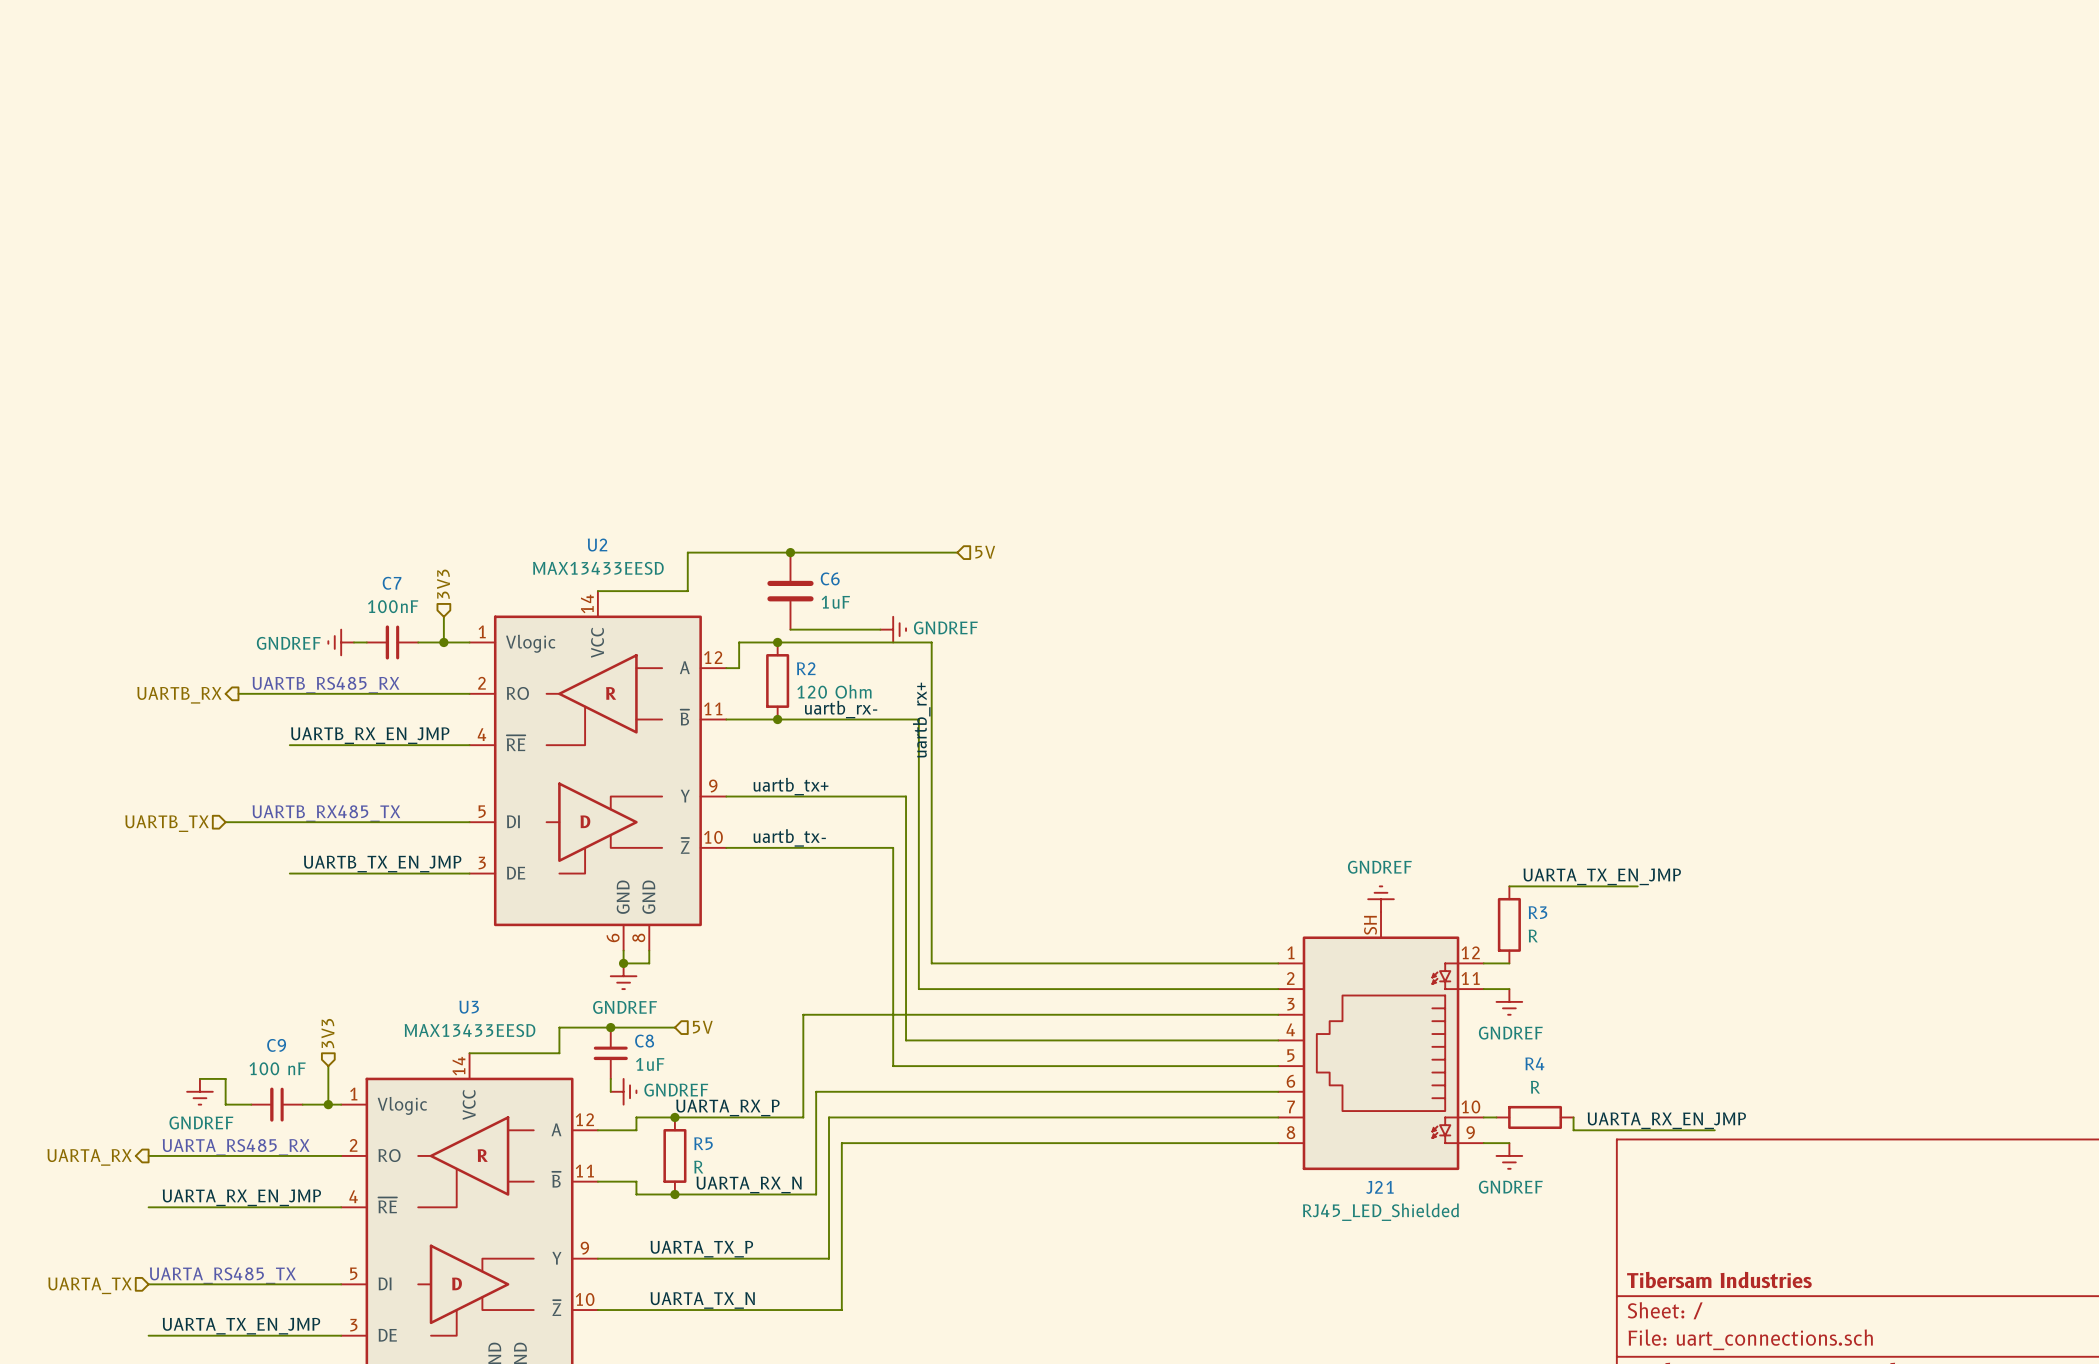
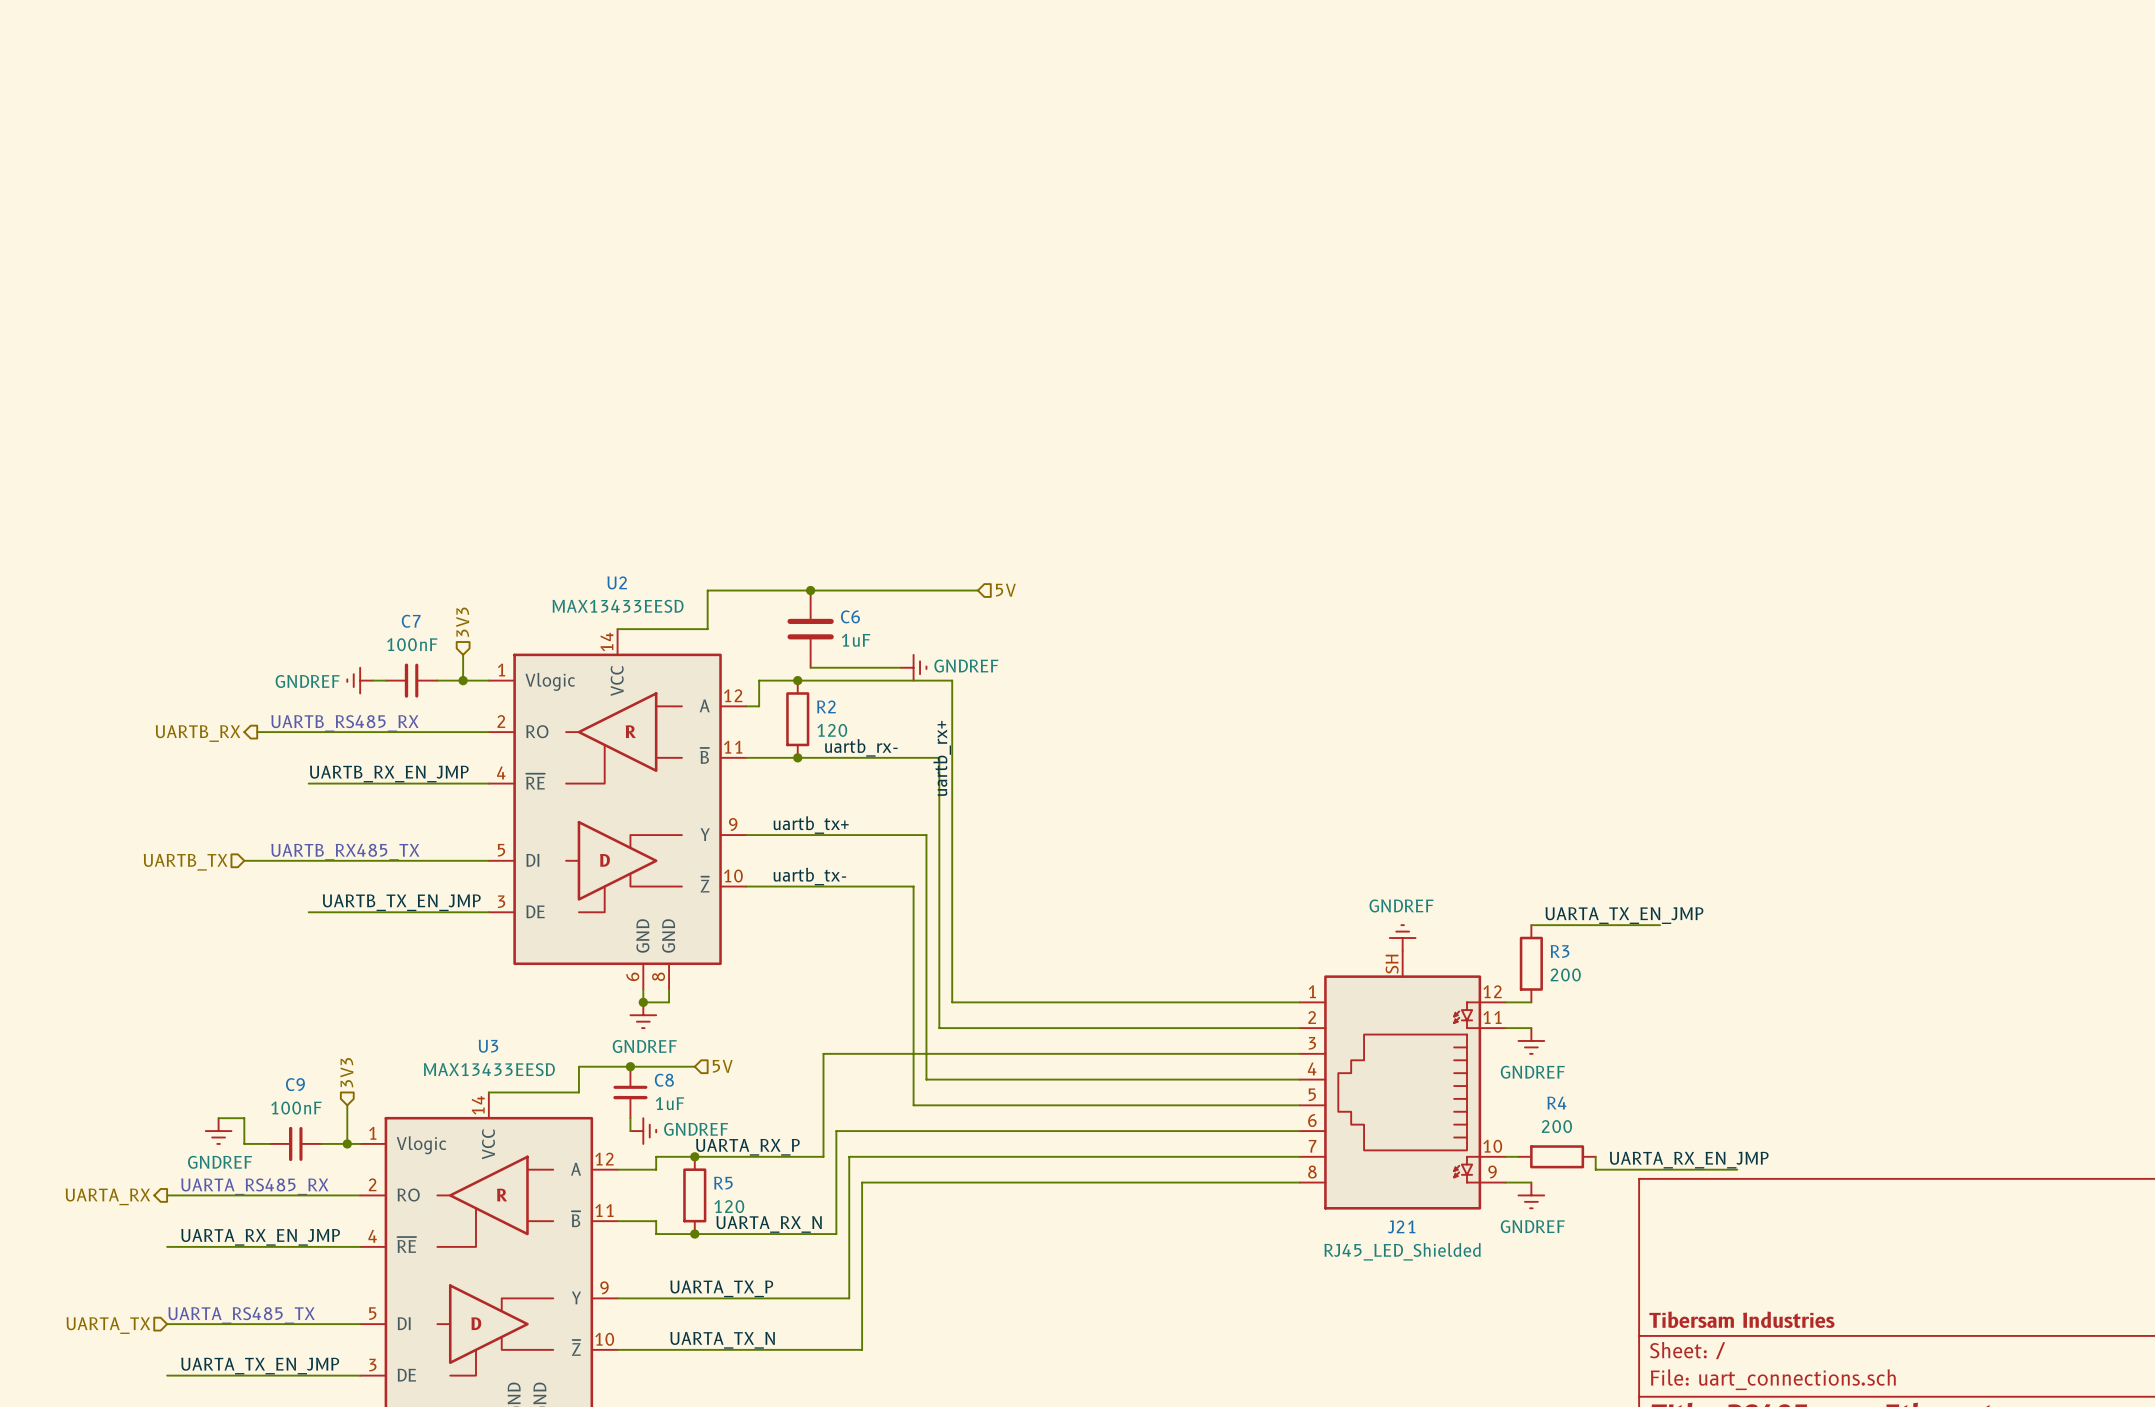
R2 value: 120 Ohm (834, 691) -> 120 (832, 730)
R3 value: R (1533, 936) -> 200 (1565, 974)
C9 value: 100 nF (277, 1068) -> 100nF (296, 1108)
R4 value: R (1535, 1087) -> 200 (1556, 1126)
R5 value: R (698, 1167) -> 120 (729, 1206)

